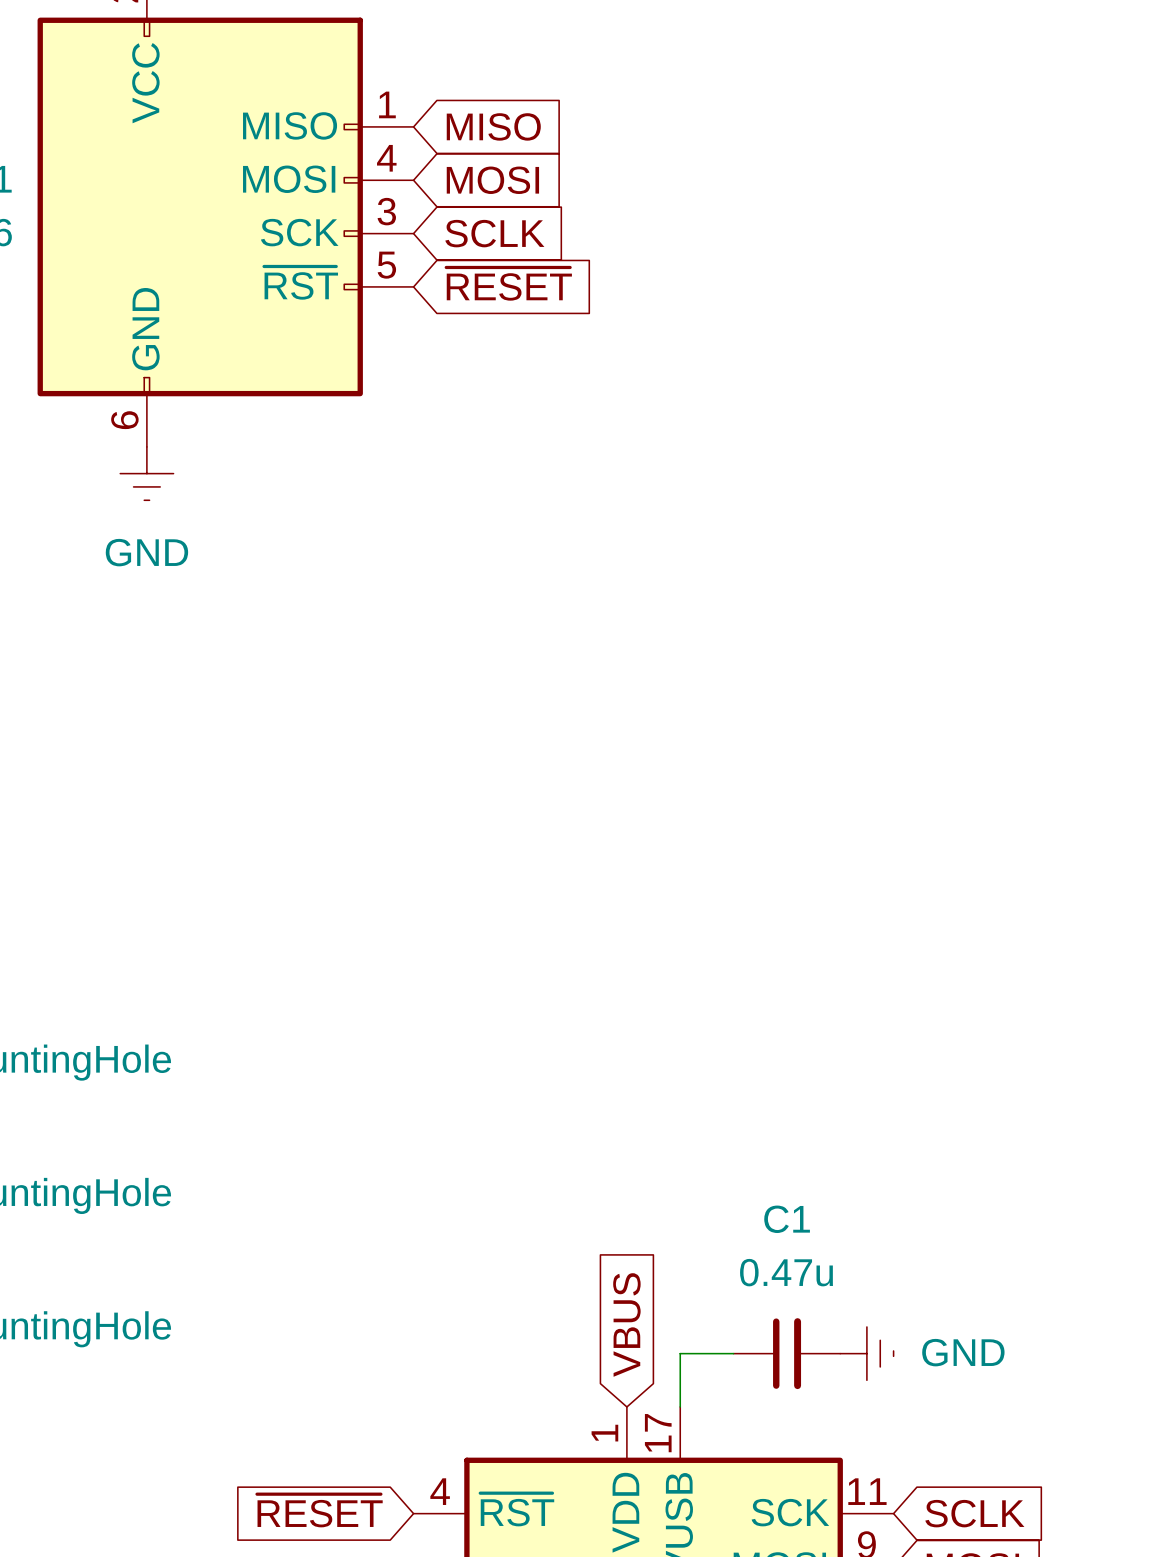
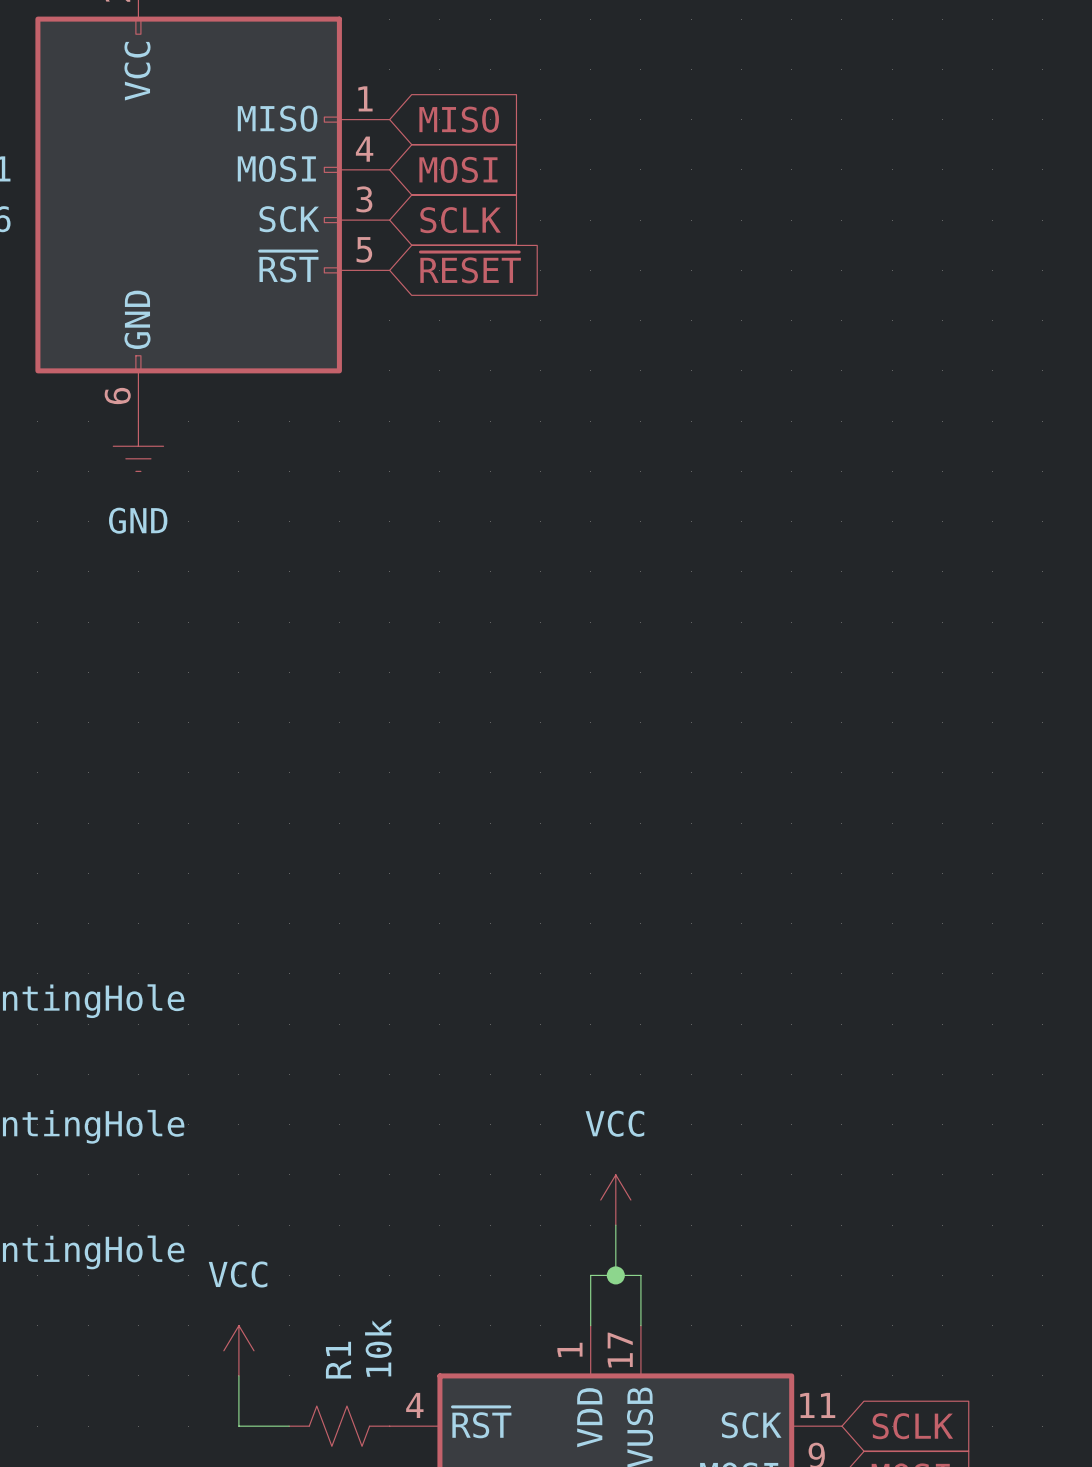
power symbol: none -> VCC (615, 1200)
global label: VBUS (626, 1324) -> none
junction: none -> (615, 1275)
wire: (680, 1353) (733, 1353) -> (640, 1275) (590, 1275) (590, 1325)
C1: 0.47u (786, 1353) -> none
power symbol: GND (866, 1353) -> none
power symbol: none -> VCC (238, 1350)
wire: none -> (238, 1375) (238, 1426) (289, 1426)
global label: ~{RESET} (319, 1510) -> none
R1: none -> 10k (339, 1426)

